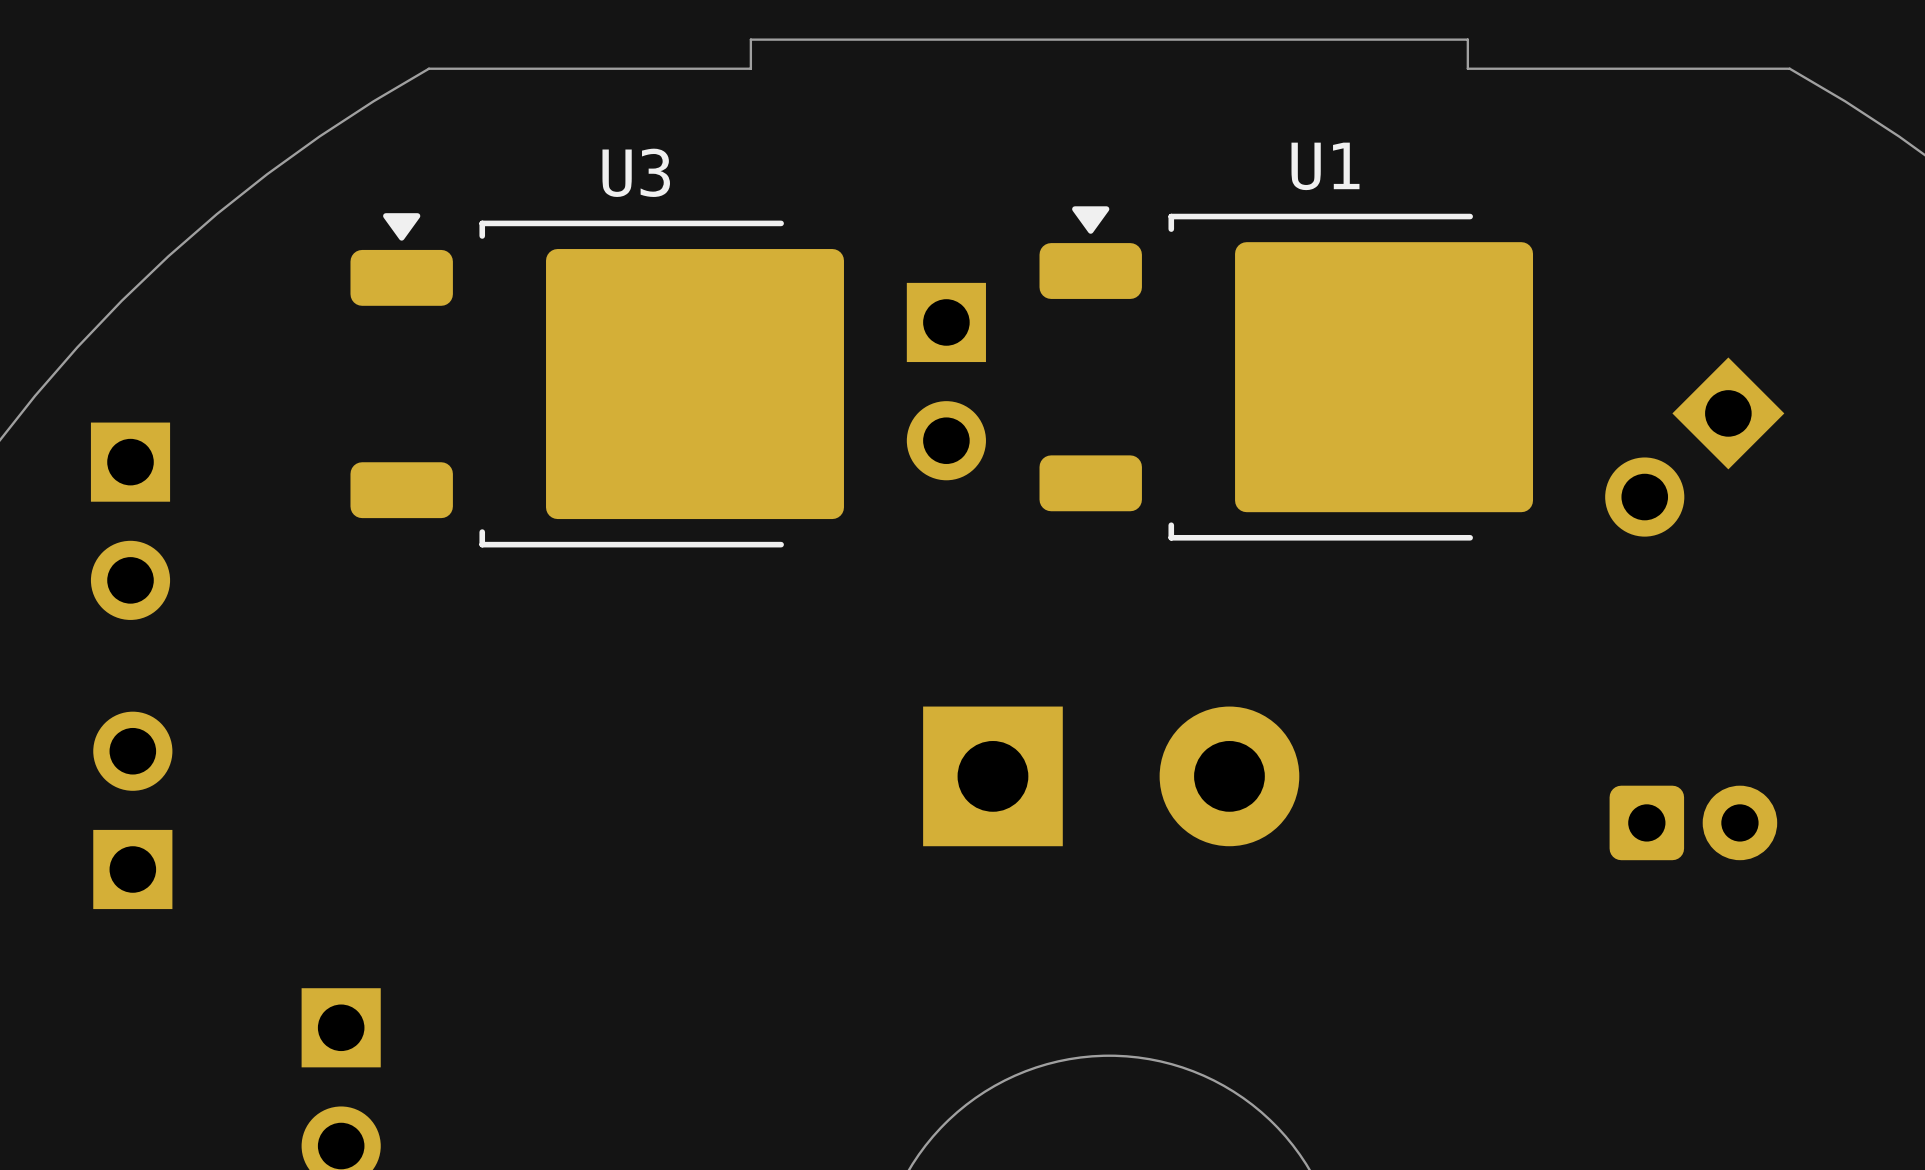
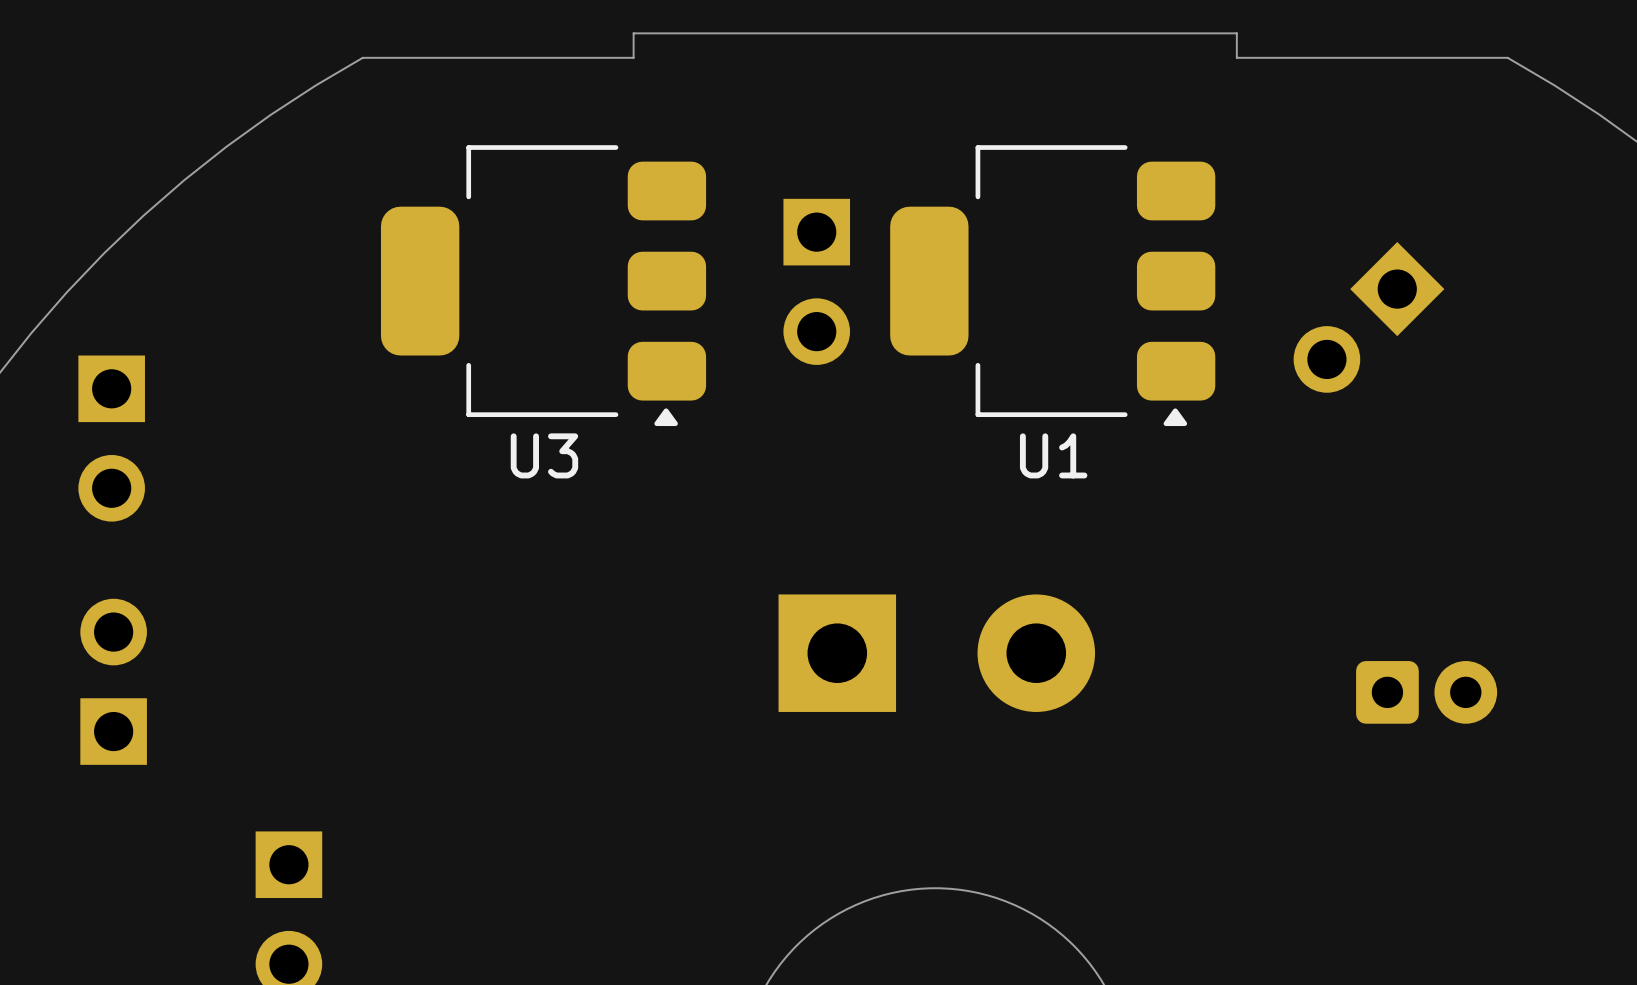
U1 name position: U1 (1325, 166) -> U1 (1053, 455)
U3 name position: U3 (636, 172) -> U3 (544, 455)
U1 footprint: [1039, 206, 1534, 541] -> [890, 145, 1216, 427]
U3 footprint: [350, 213, 844, 548] -> [380, 145, 707, 427]
part position: (946, 381) -> (816, 281)
part position: (1694, 447) -> (1369, 317)

